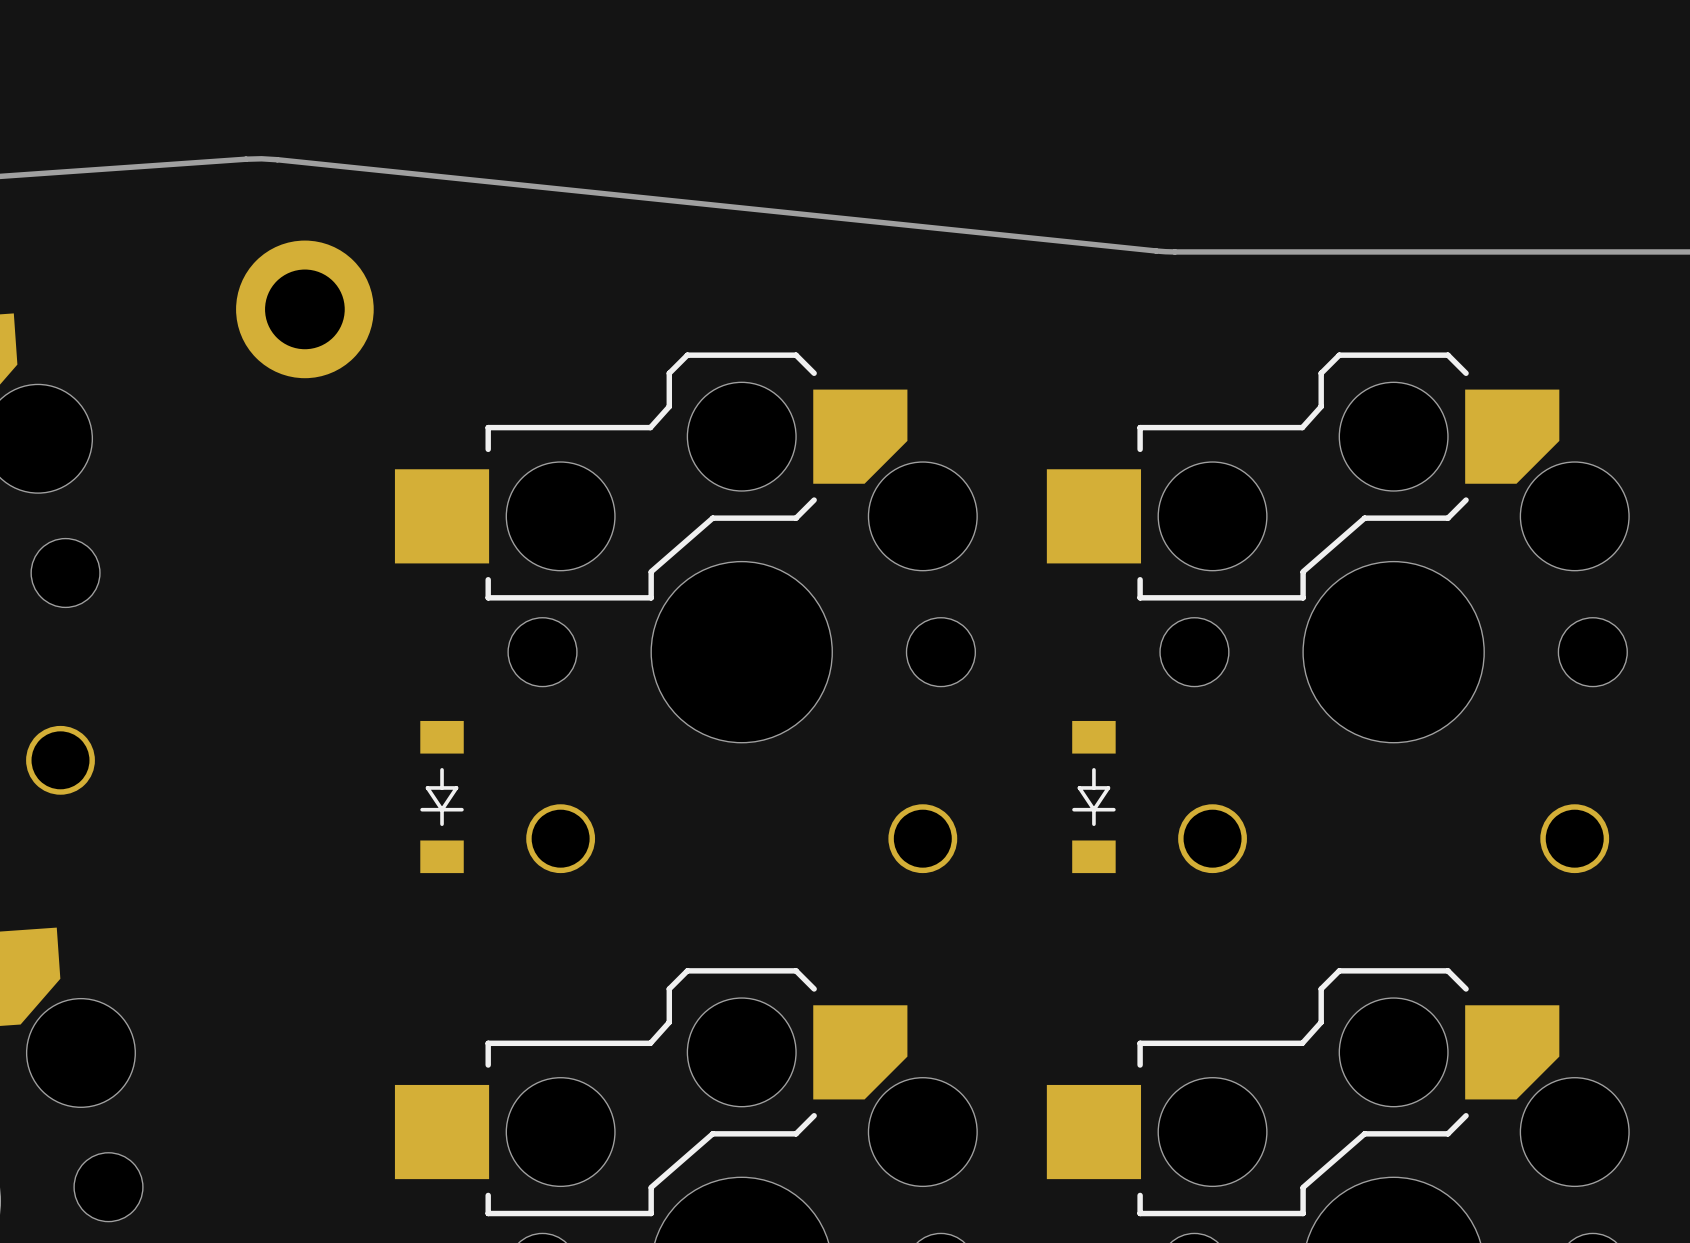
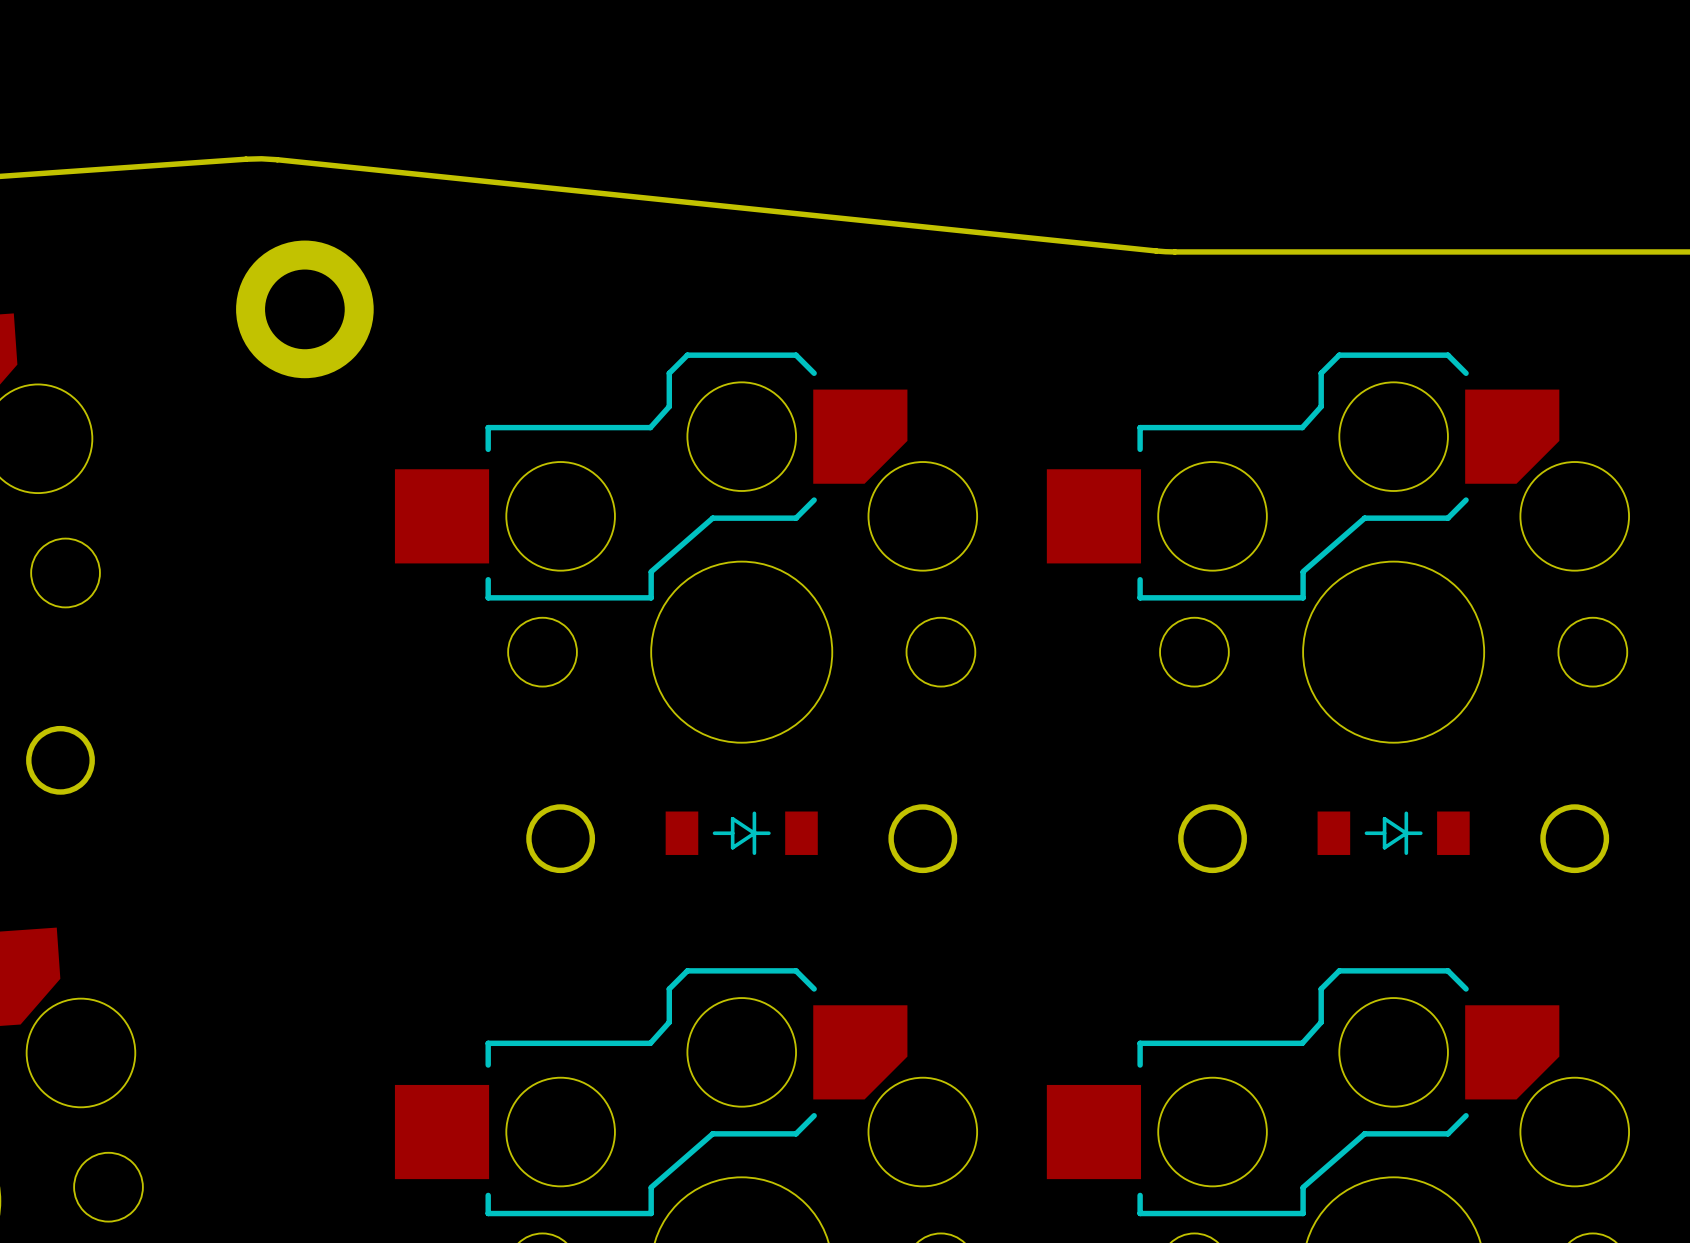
part: (442, 797) -> none
part: (1093, 797) -> none
part: none -> (741, 833)
part: none -> (1393, 833)

